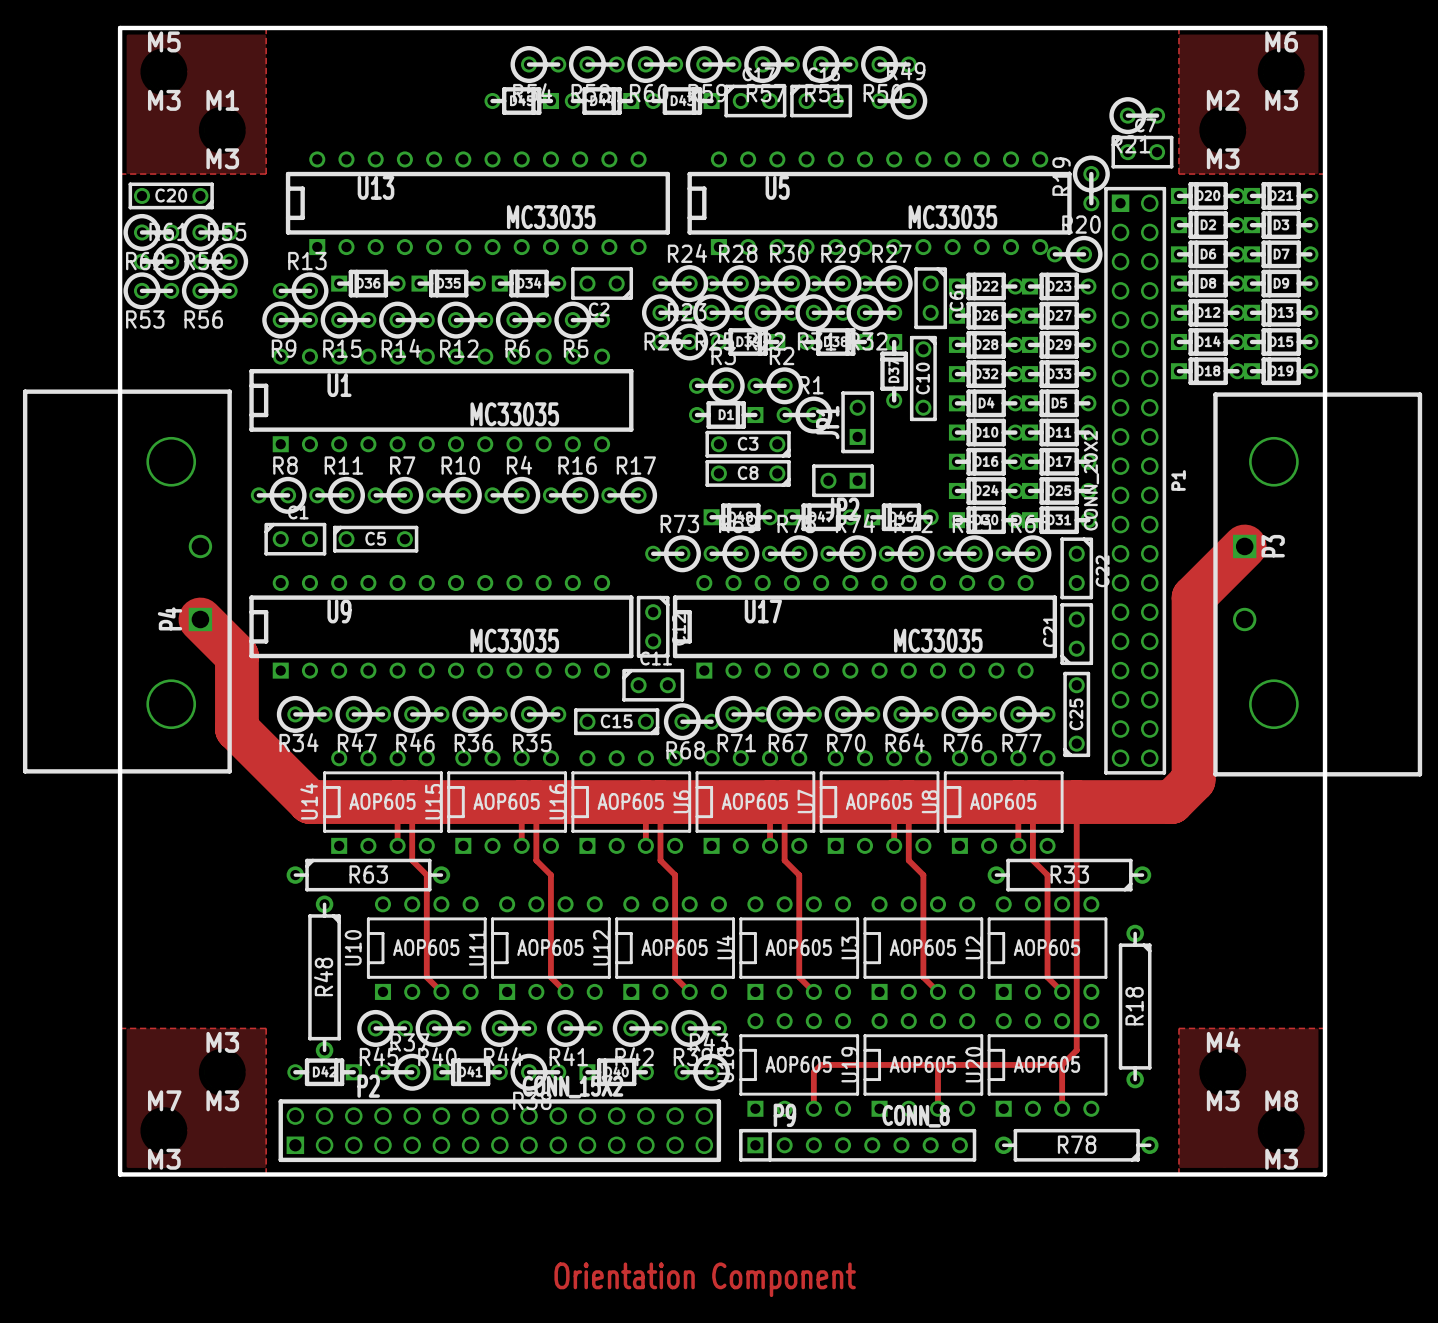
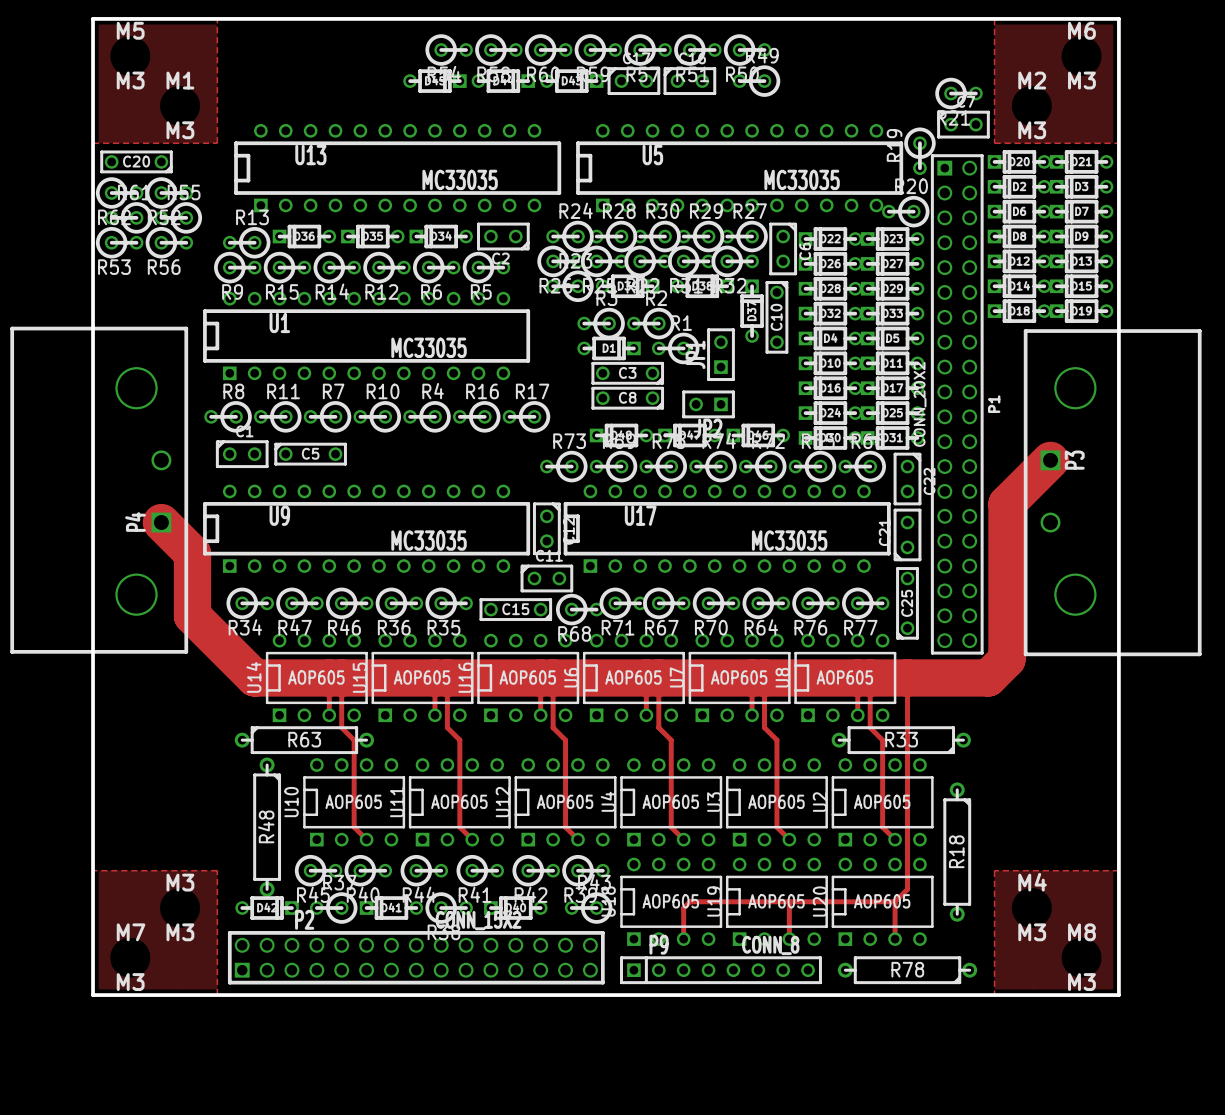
text: Orientation Component (705, 1279) -> none

